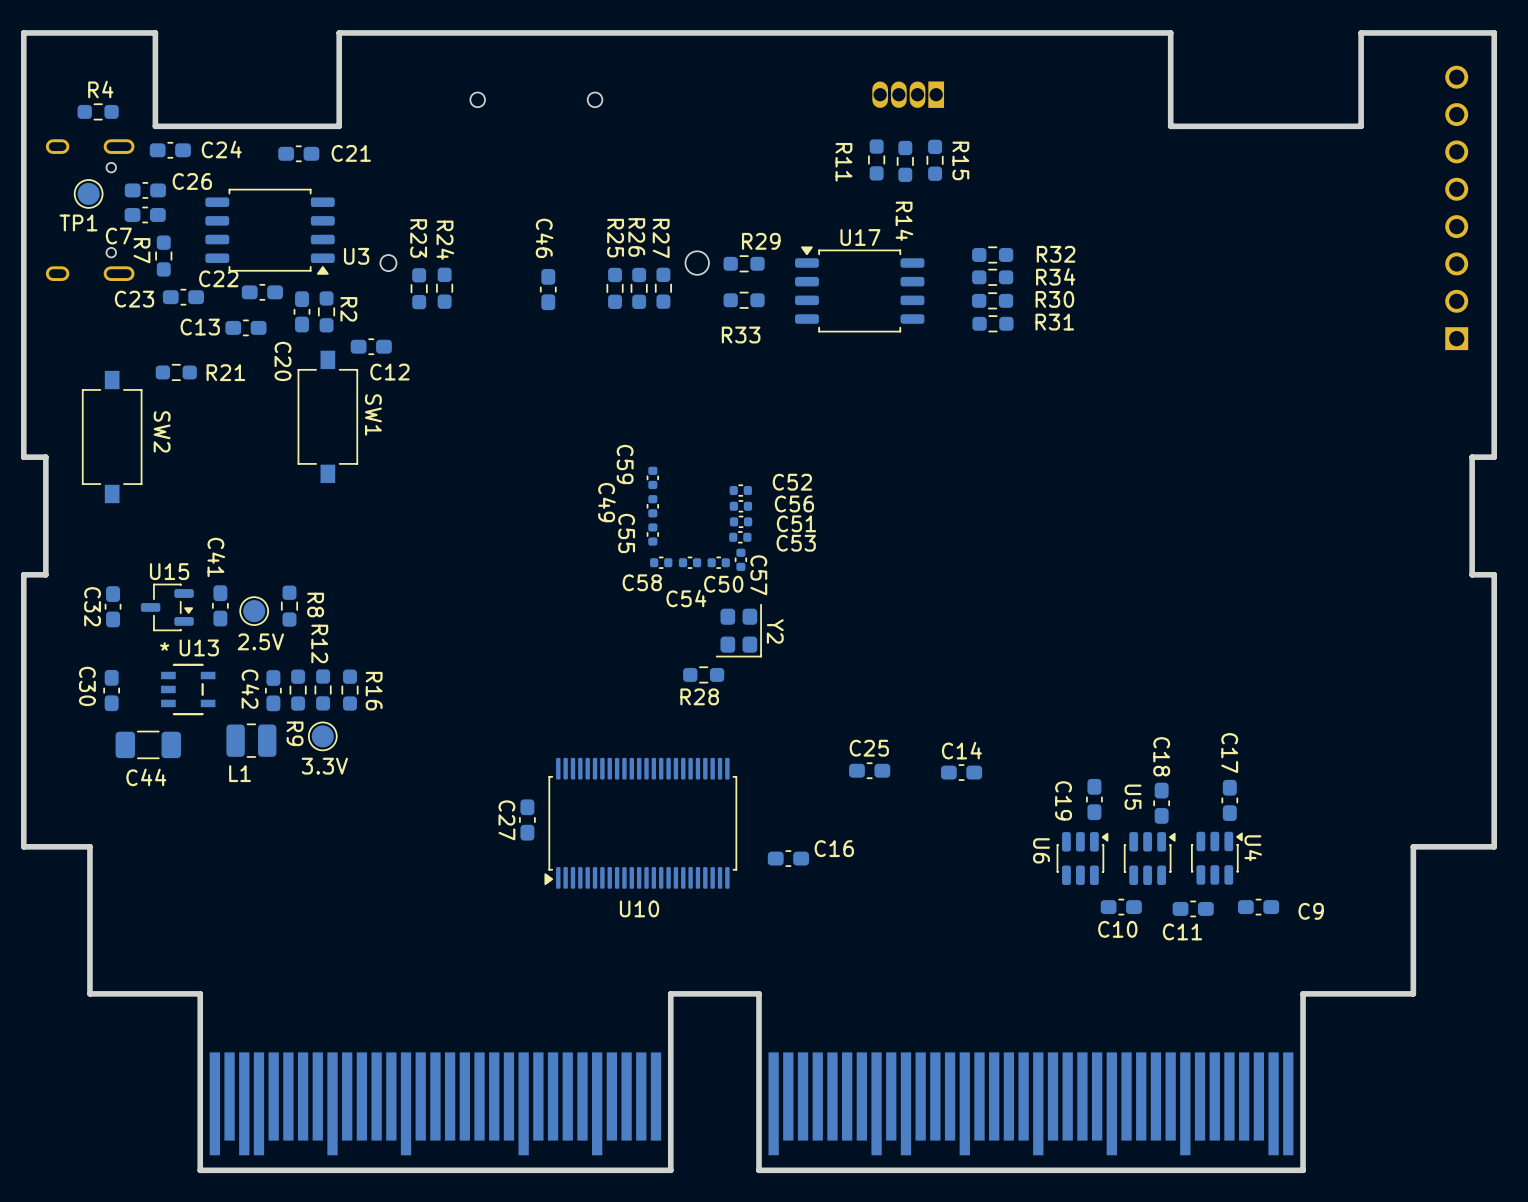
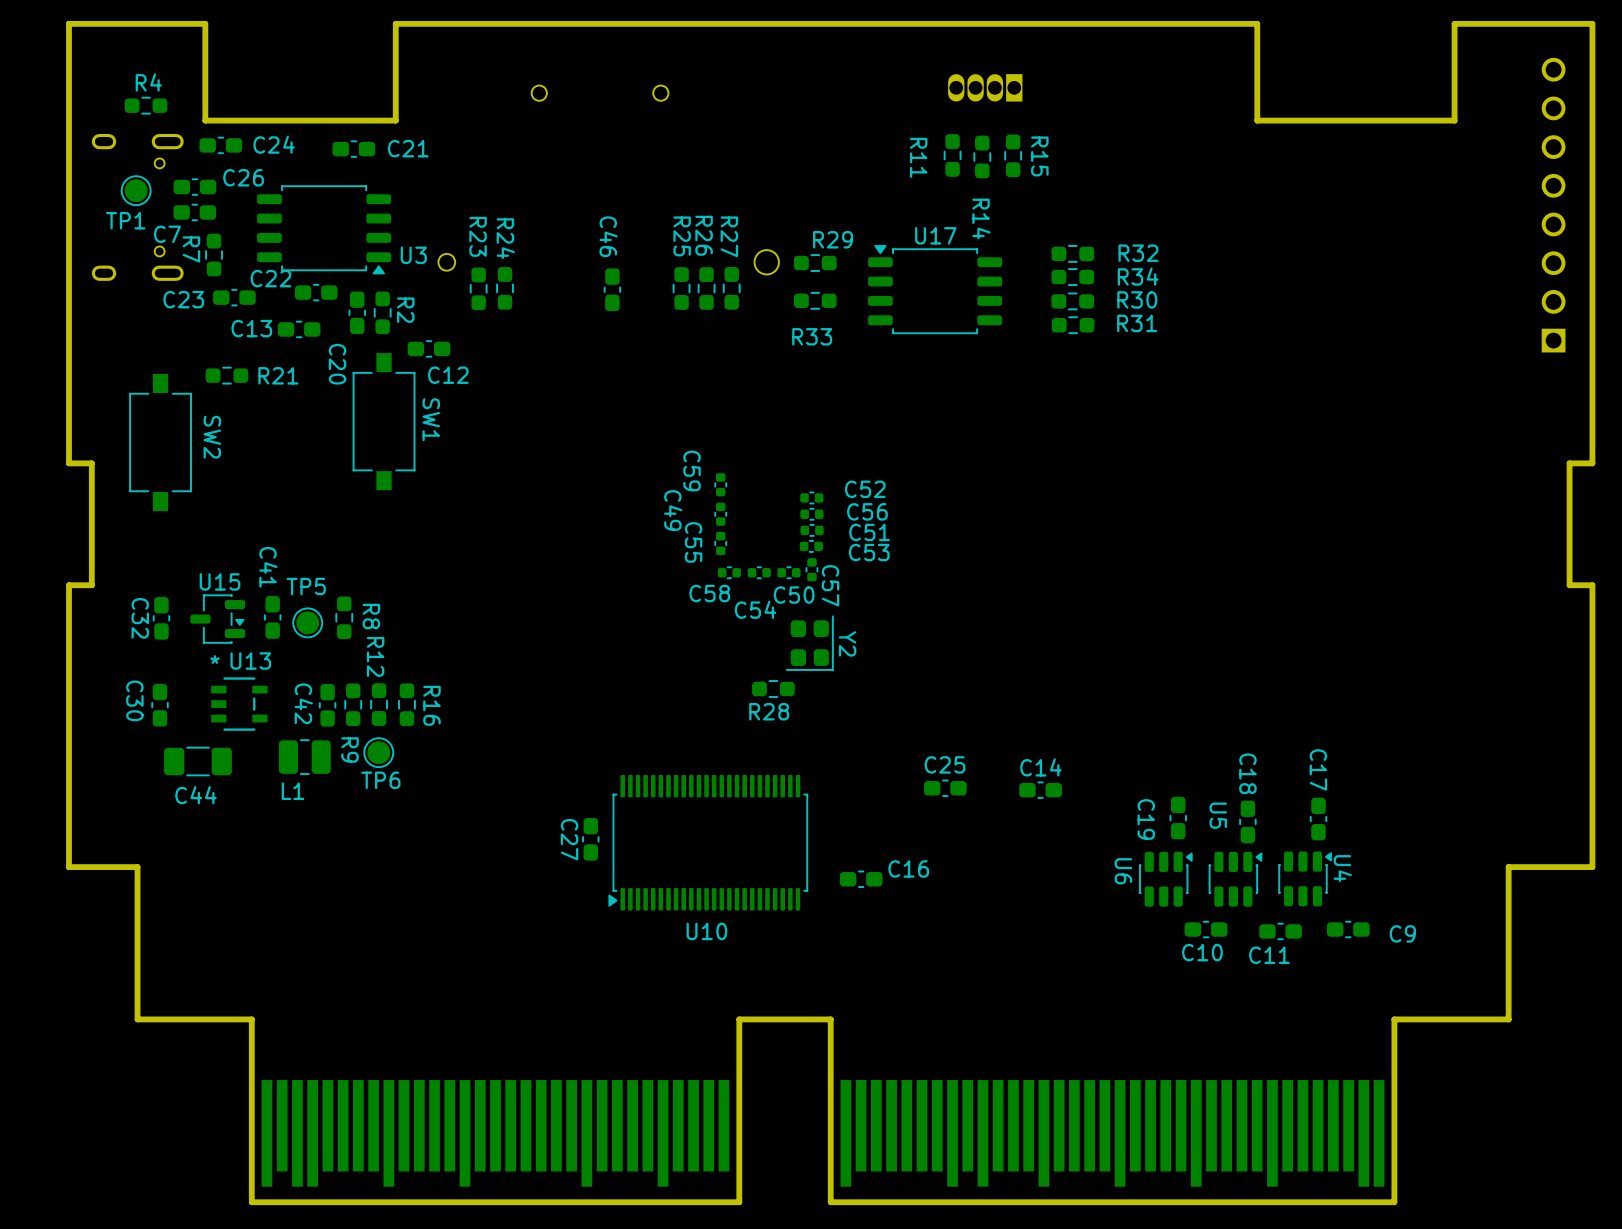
TP5 name: none -> TP5 (306, 586)
TP5 value: 2.5V (260, 641) -> none
TP6 name: none -> TP6 (380, 780)
TP6 value: 3.3V (324, 766) -> none

